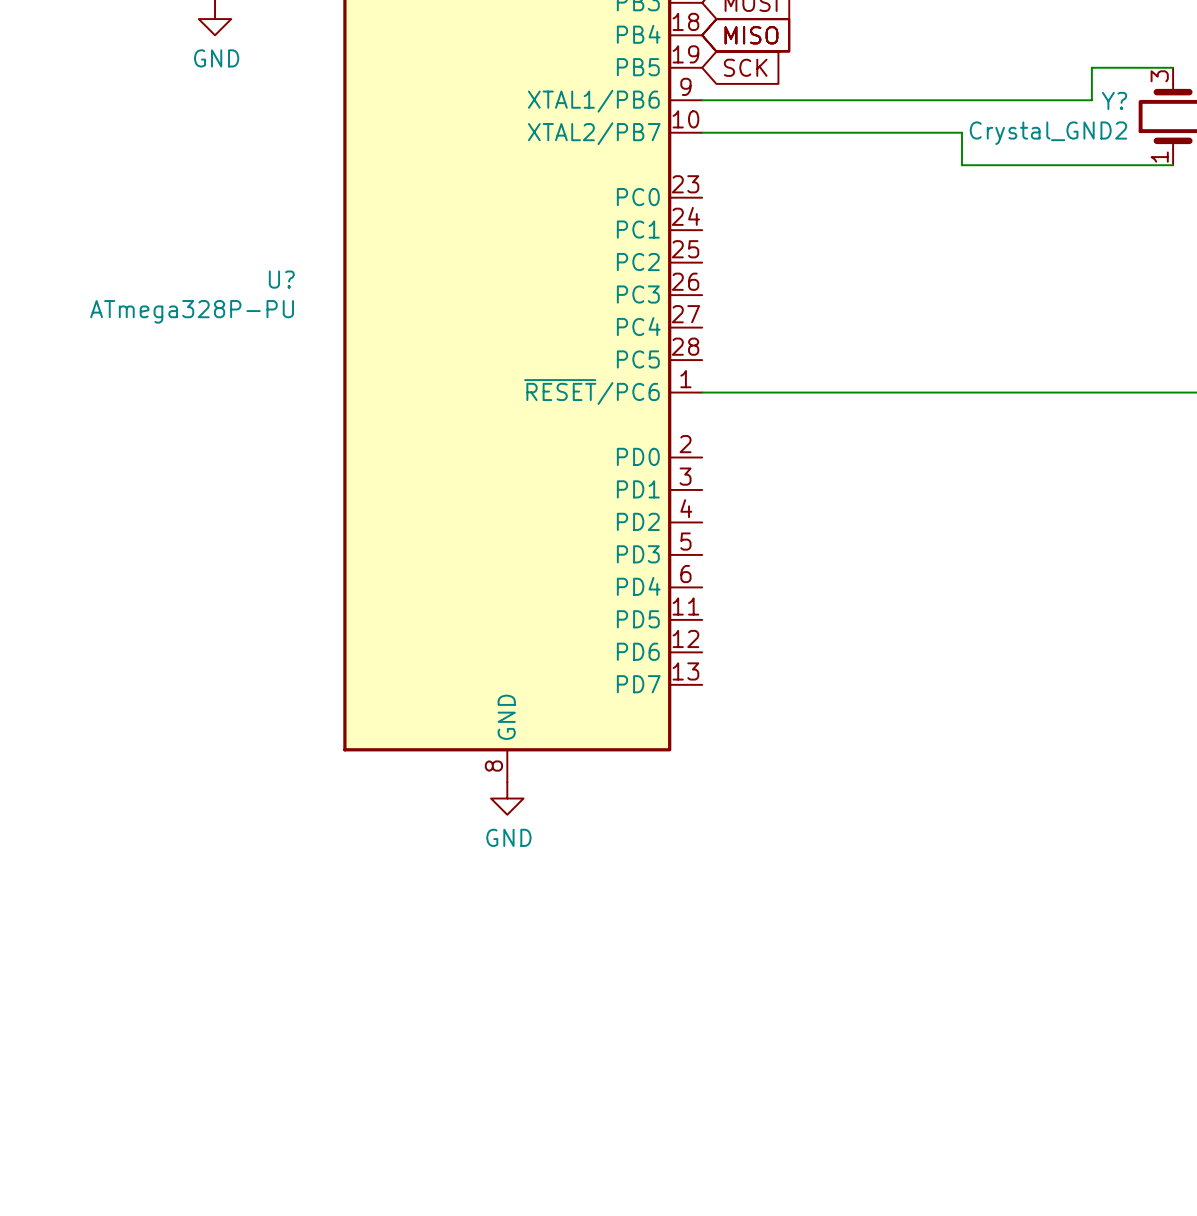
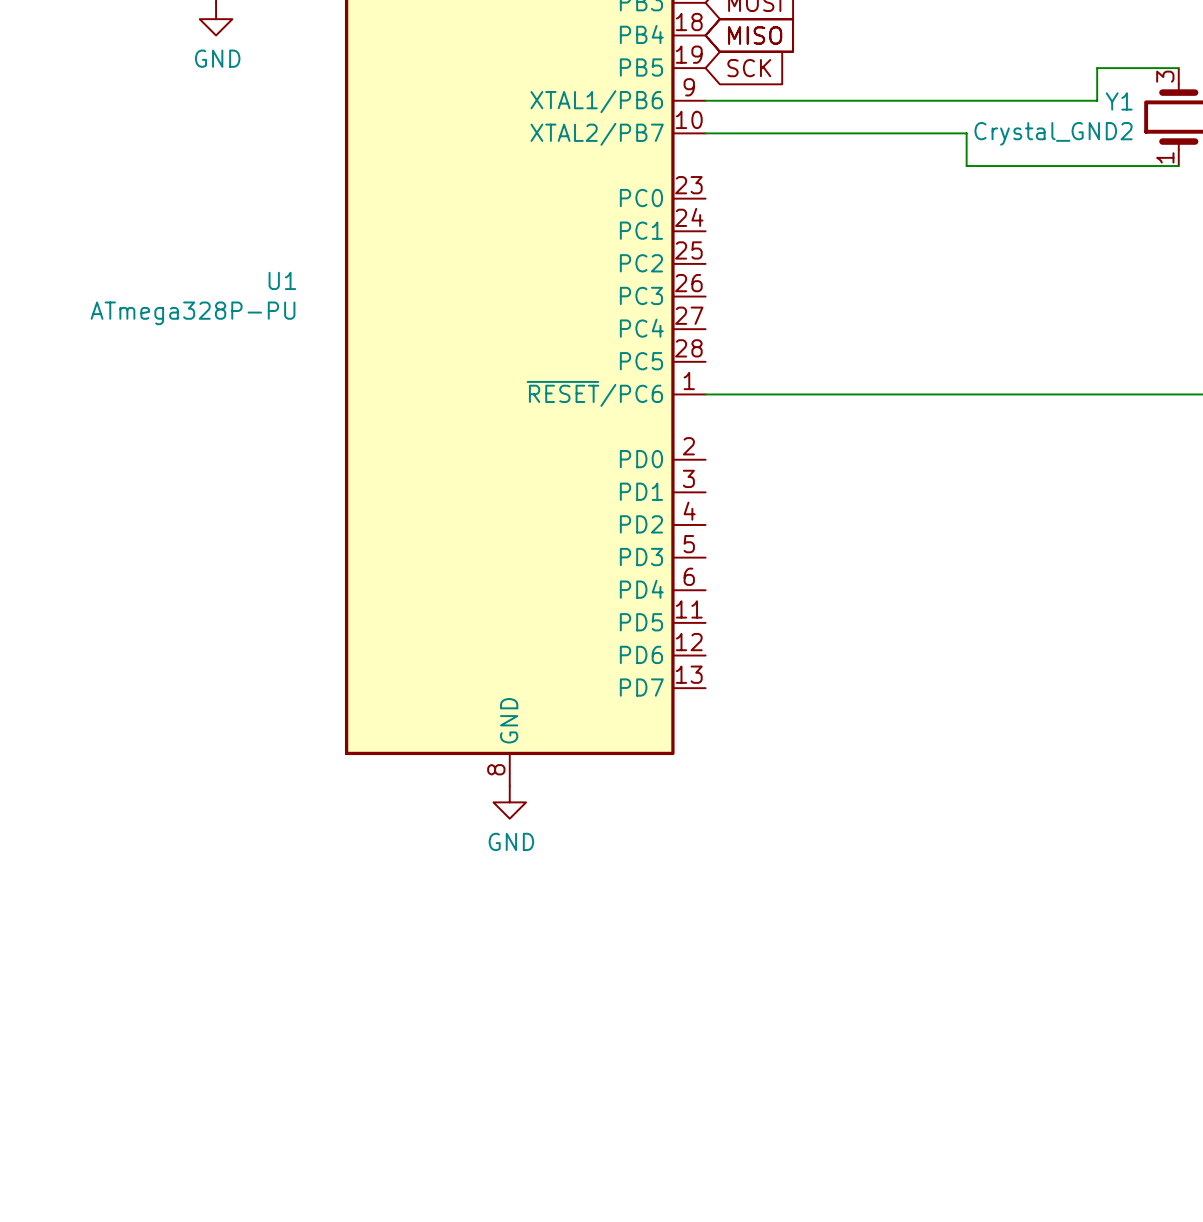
Y? name: Y? (1114, 100) -> Y1 (1119, 101)
U? name: U? (281, 279) -> U1 (282, 280)

